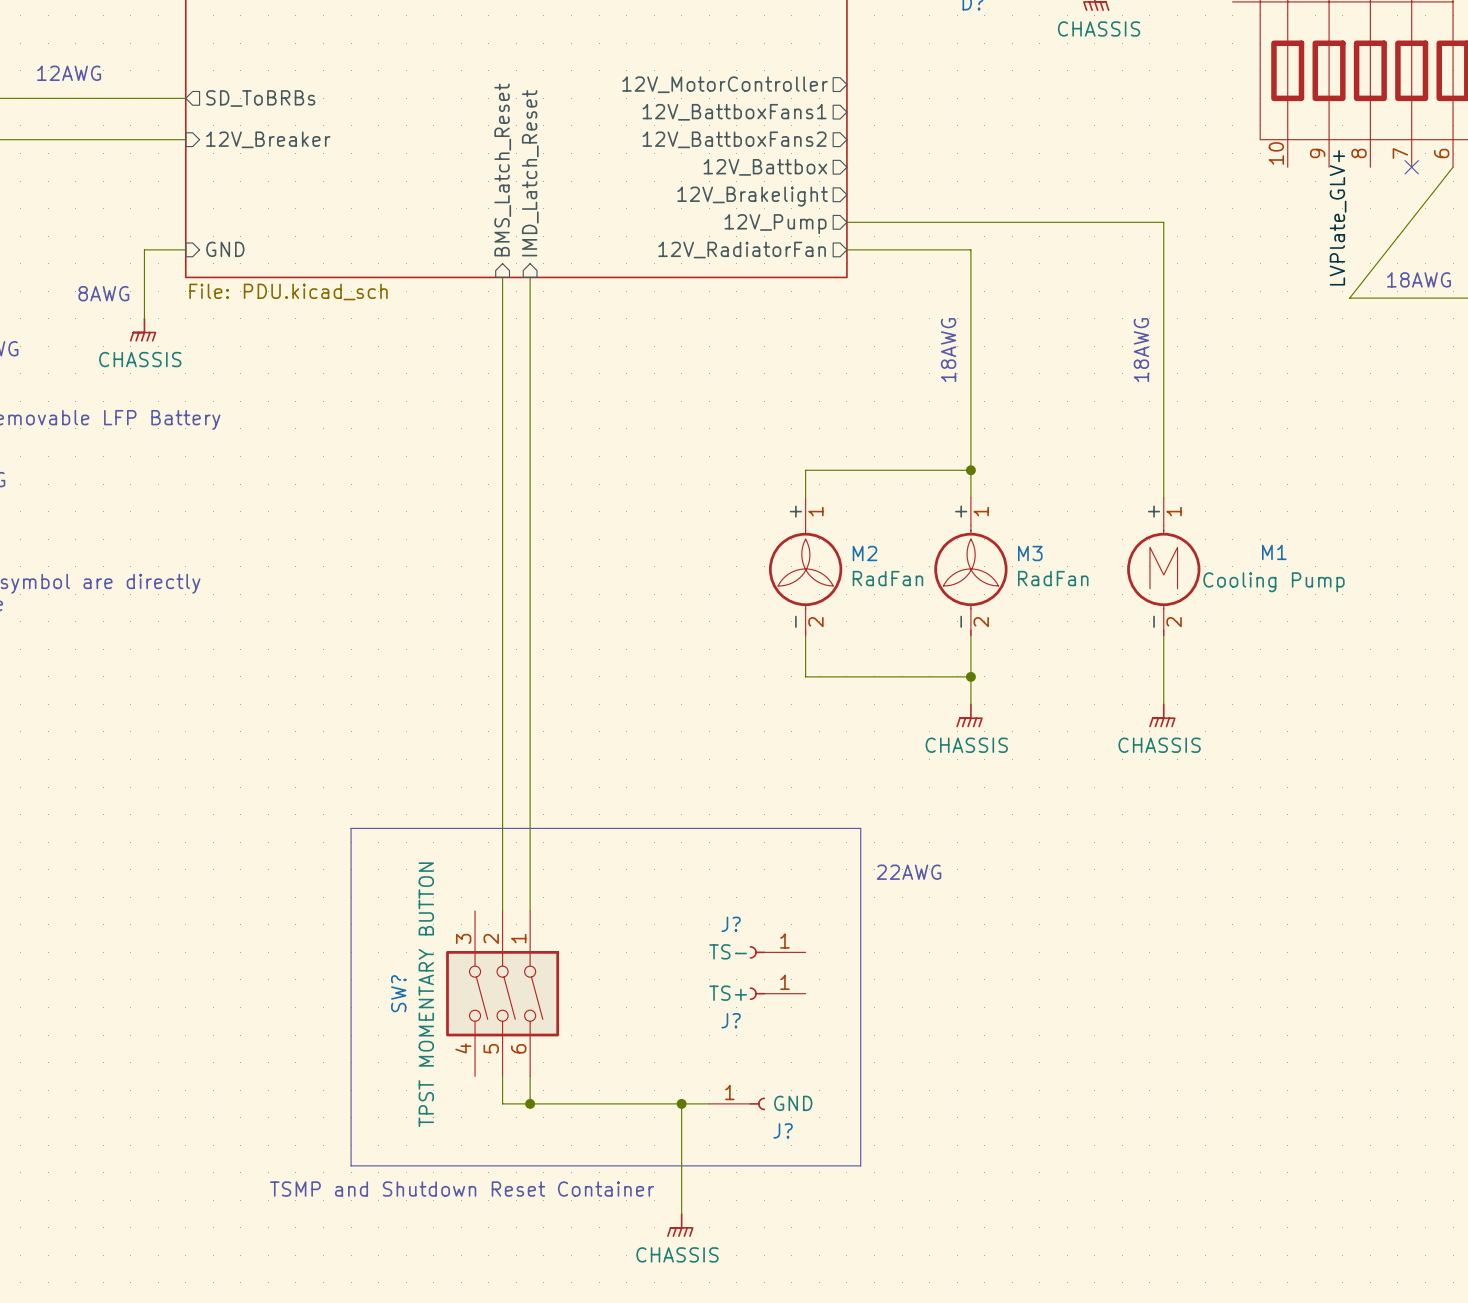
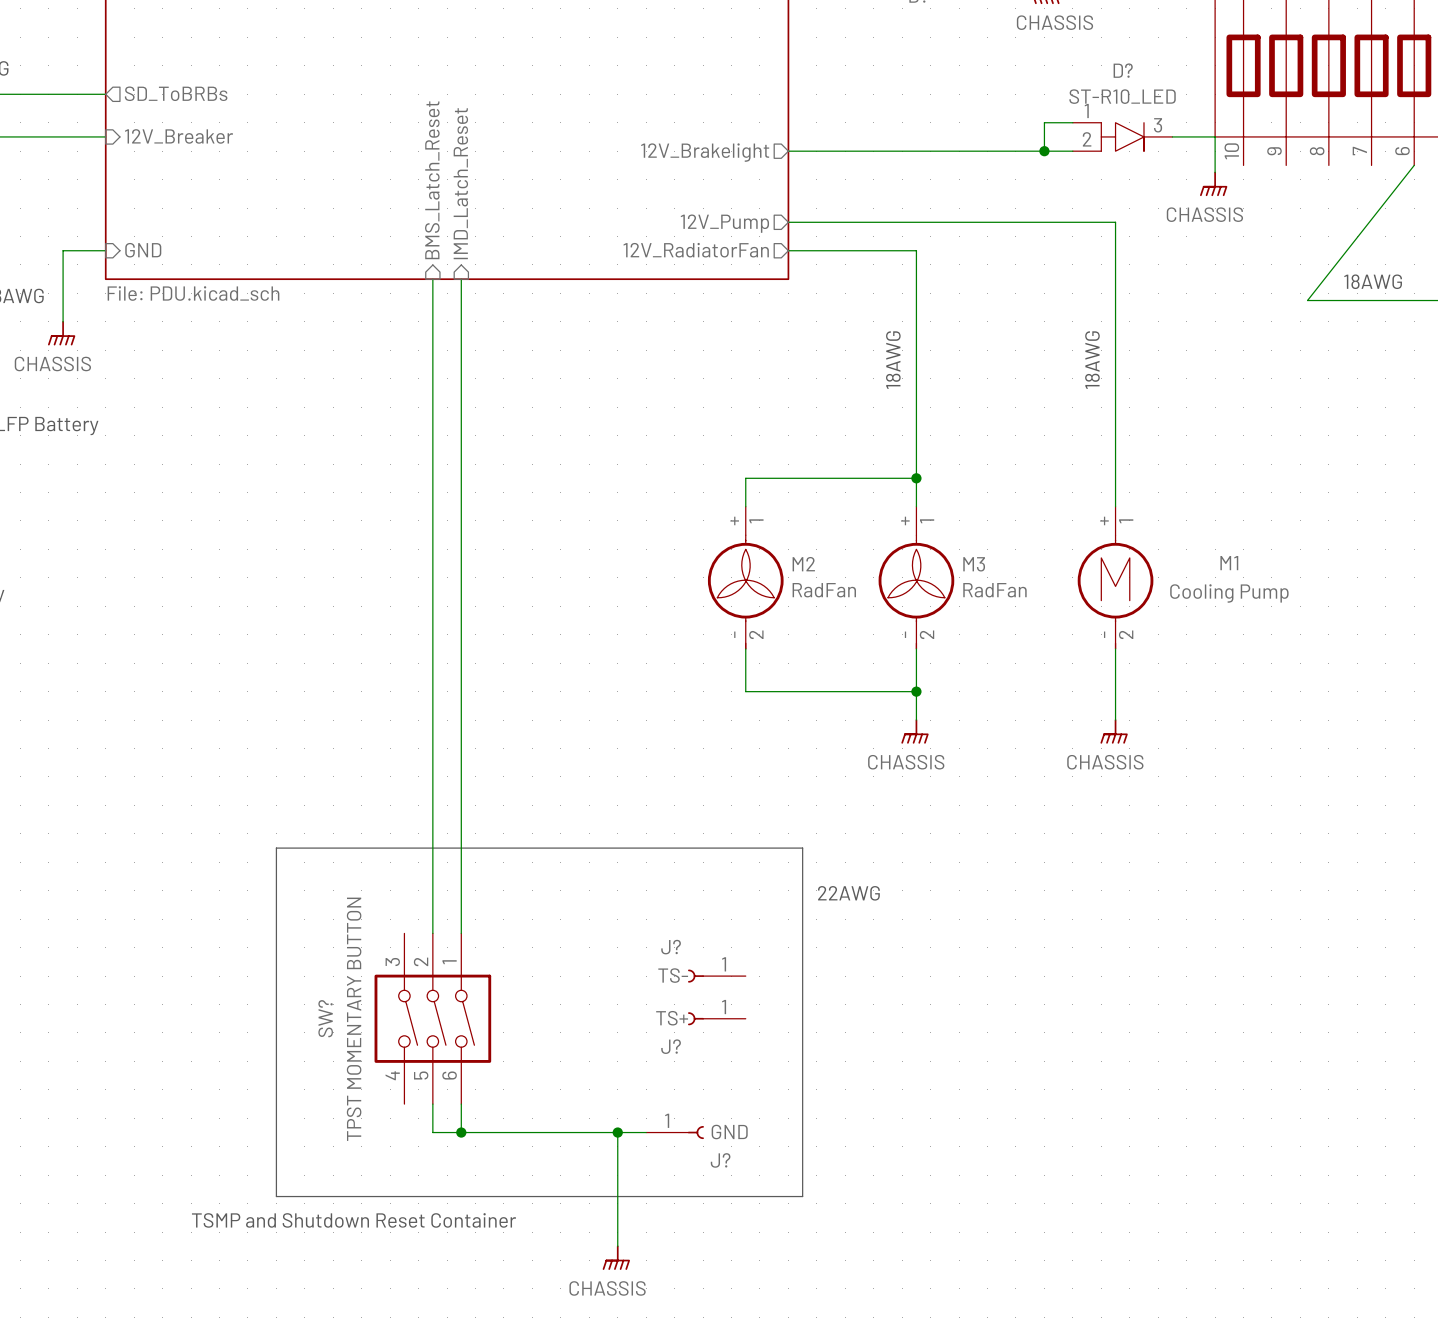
sheet pin: 12V_MotorController (725, 84) -> none
sheet pin: 12V_BattboxFans1 (734, 112) -> none
wire: none -> (1072, 122) (1044, 122) (1044, 151)
sheet pin: 12V_BattboxFans2 (734, 139) -> none
D?: none -> ST-R10_LED (1122, 136)
wire: none -> (1172, 136) (1215, 136) (1215, 172)
wire: none -> (788, 151) (1072, 151)
junction: none -> (1044, 151)
sheet pin: 12V_Battbox (765, 167) -> none
no-connect mark: (1411, 167) -> none
part: none -> CHASSIS (1213, 183)
sheet pin position: 12V_Brakelight (752, 196) -> 12V_Brakelight (705, 152)
label: LVPlate_GLV+ (1338, 217) -> none

